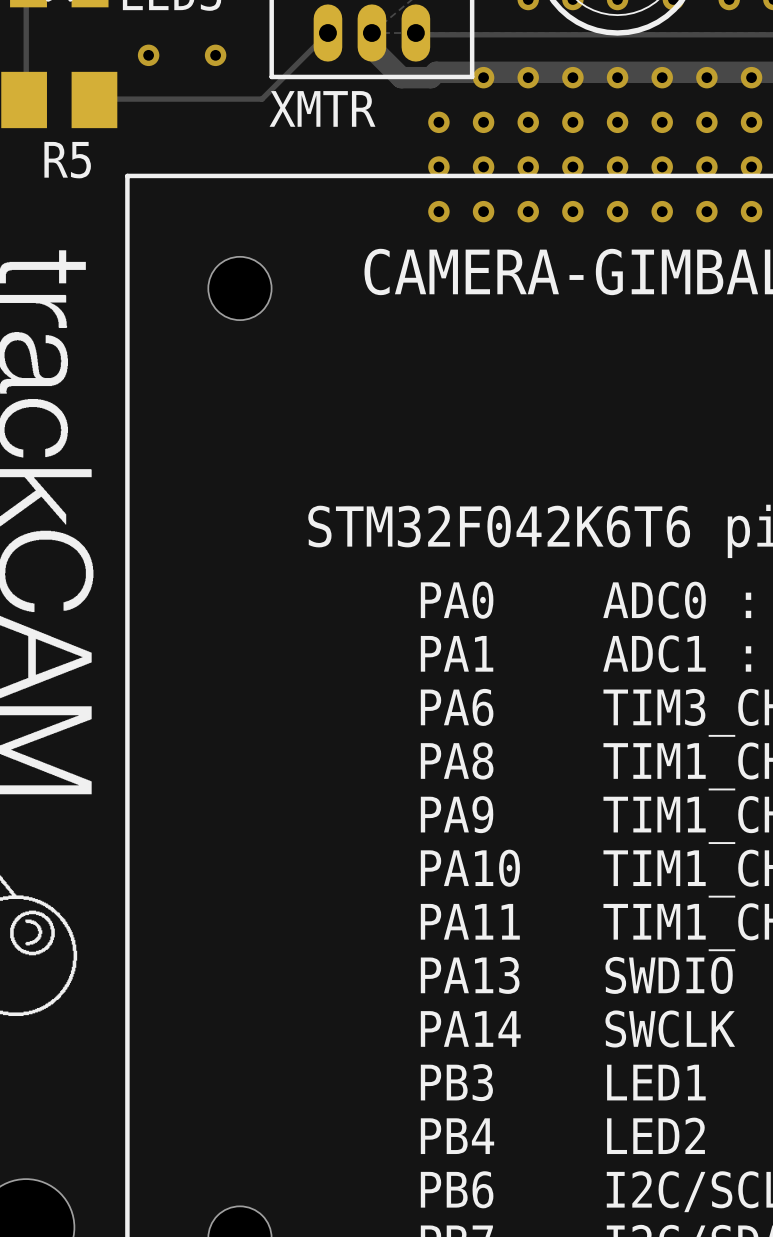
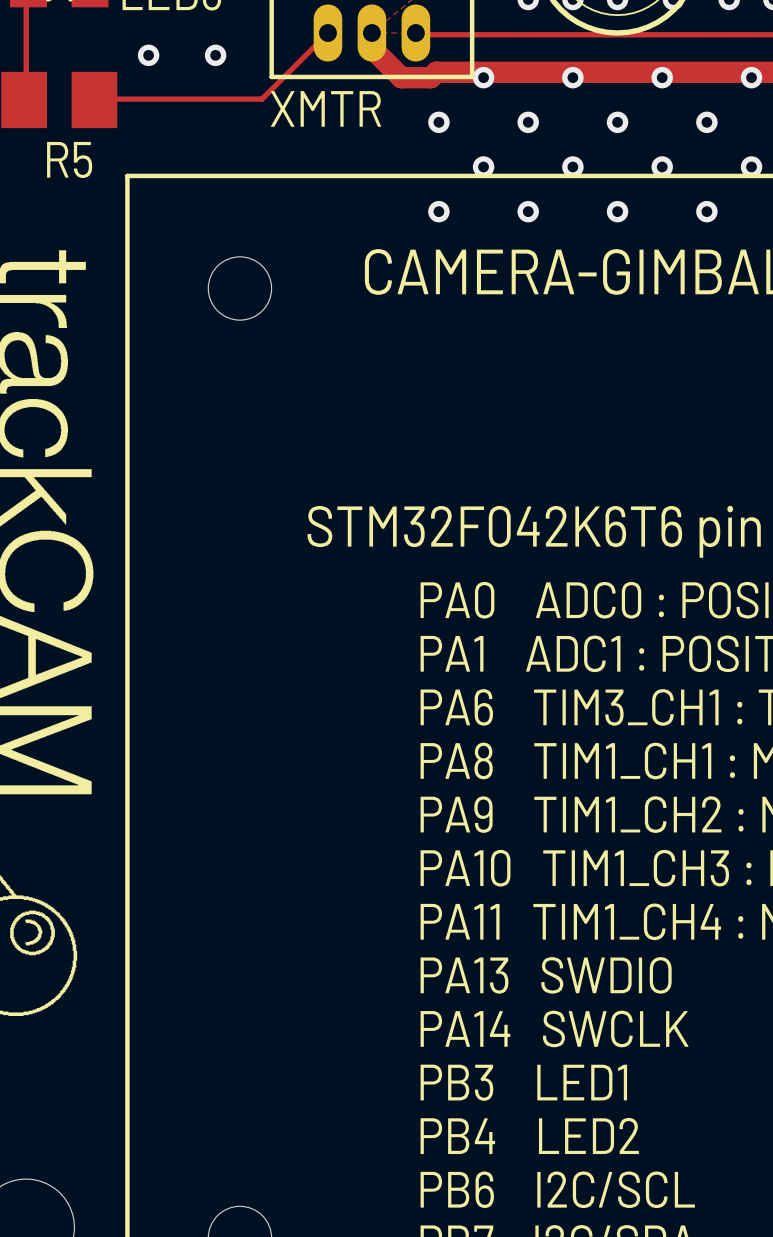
via: (528, 77) -> none
via: (617, 77) -> none
via: (706, 77) -> none
via: (483, 122) -> none
via: (572, 122) -> none
via: (662, 122) -> none
via: (751, 122) -> none
via: (438, 166) -> none
via: (528, 166) -> none
via: (617, 166) -> none
via: (706, 166) -> none
via: (483, 211) -> none
via: (572, 211) -> none
via: (662, 211) -> none
via: (751, 211) -> none

